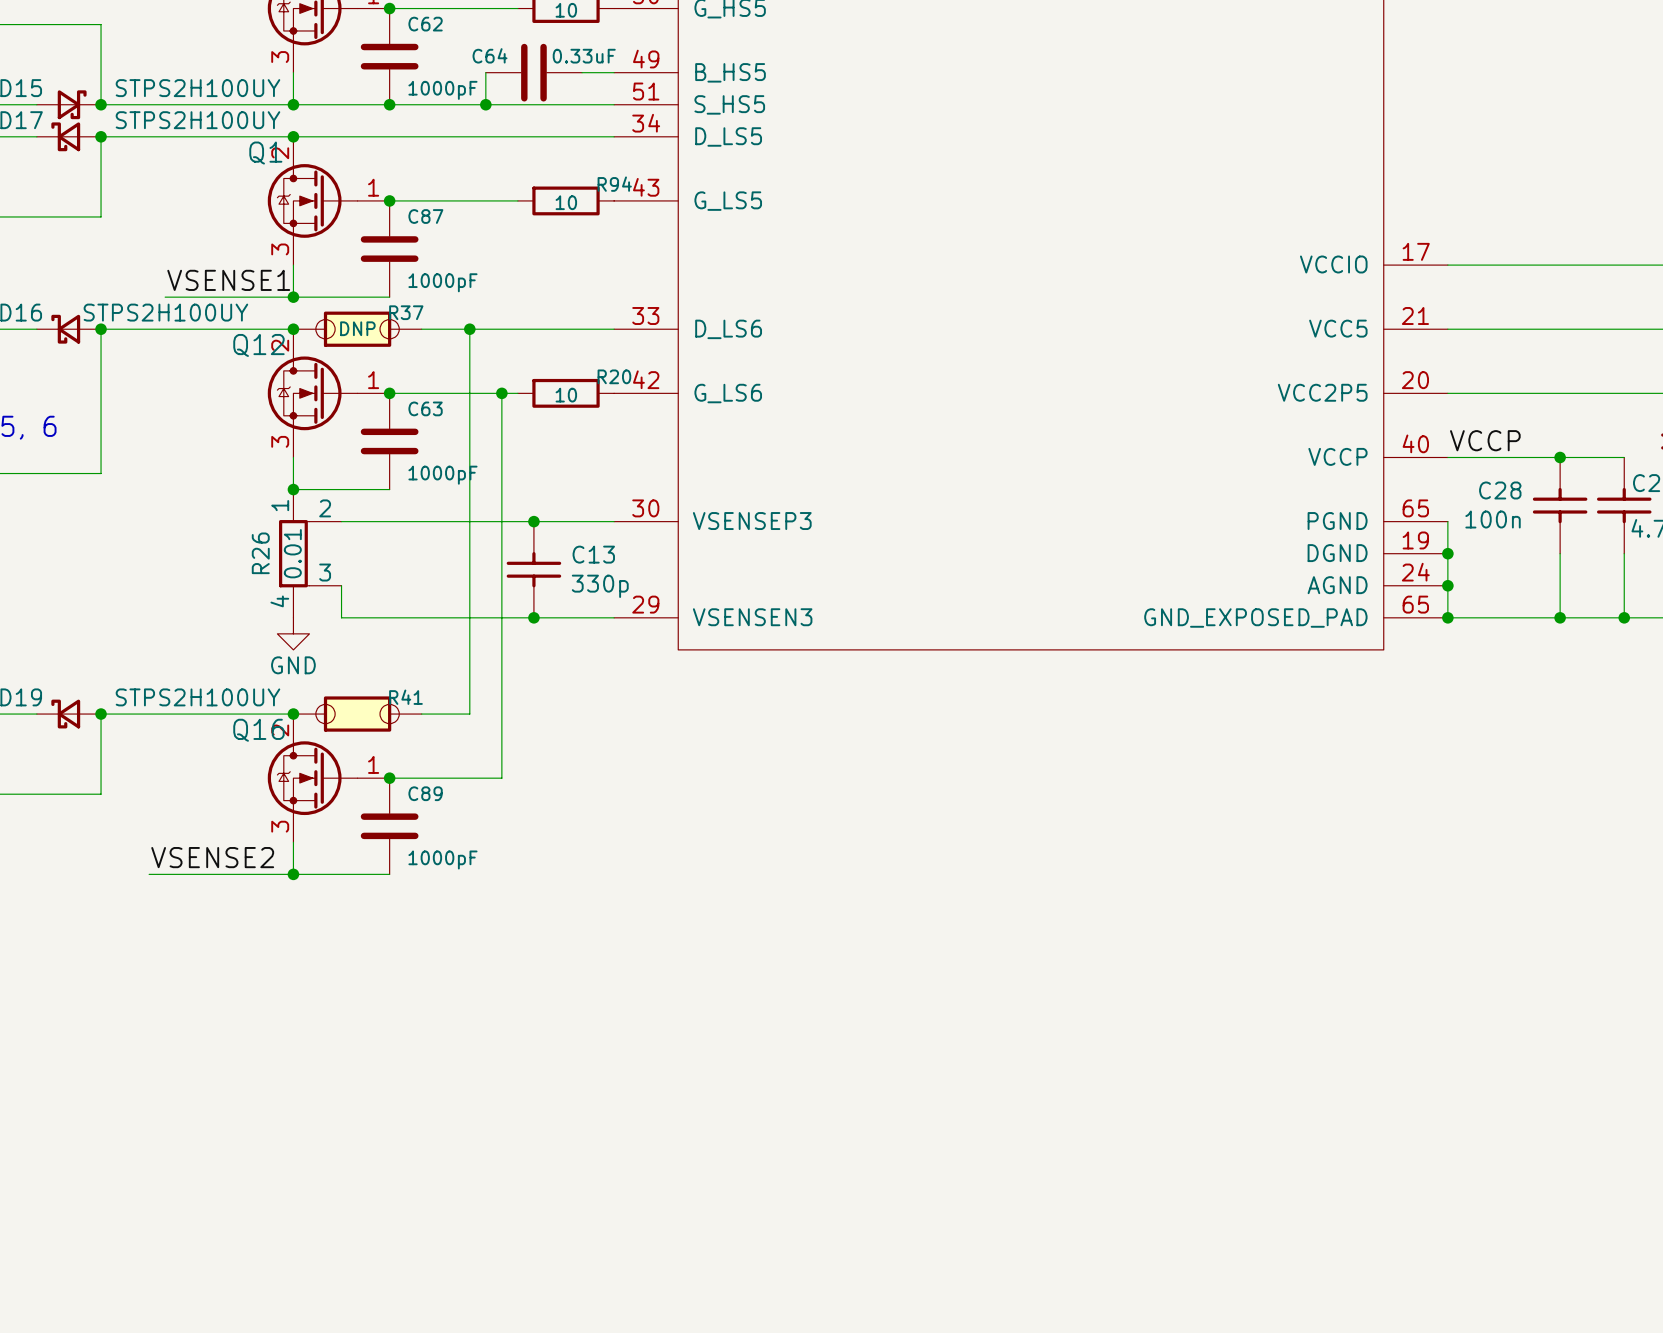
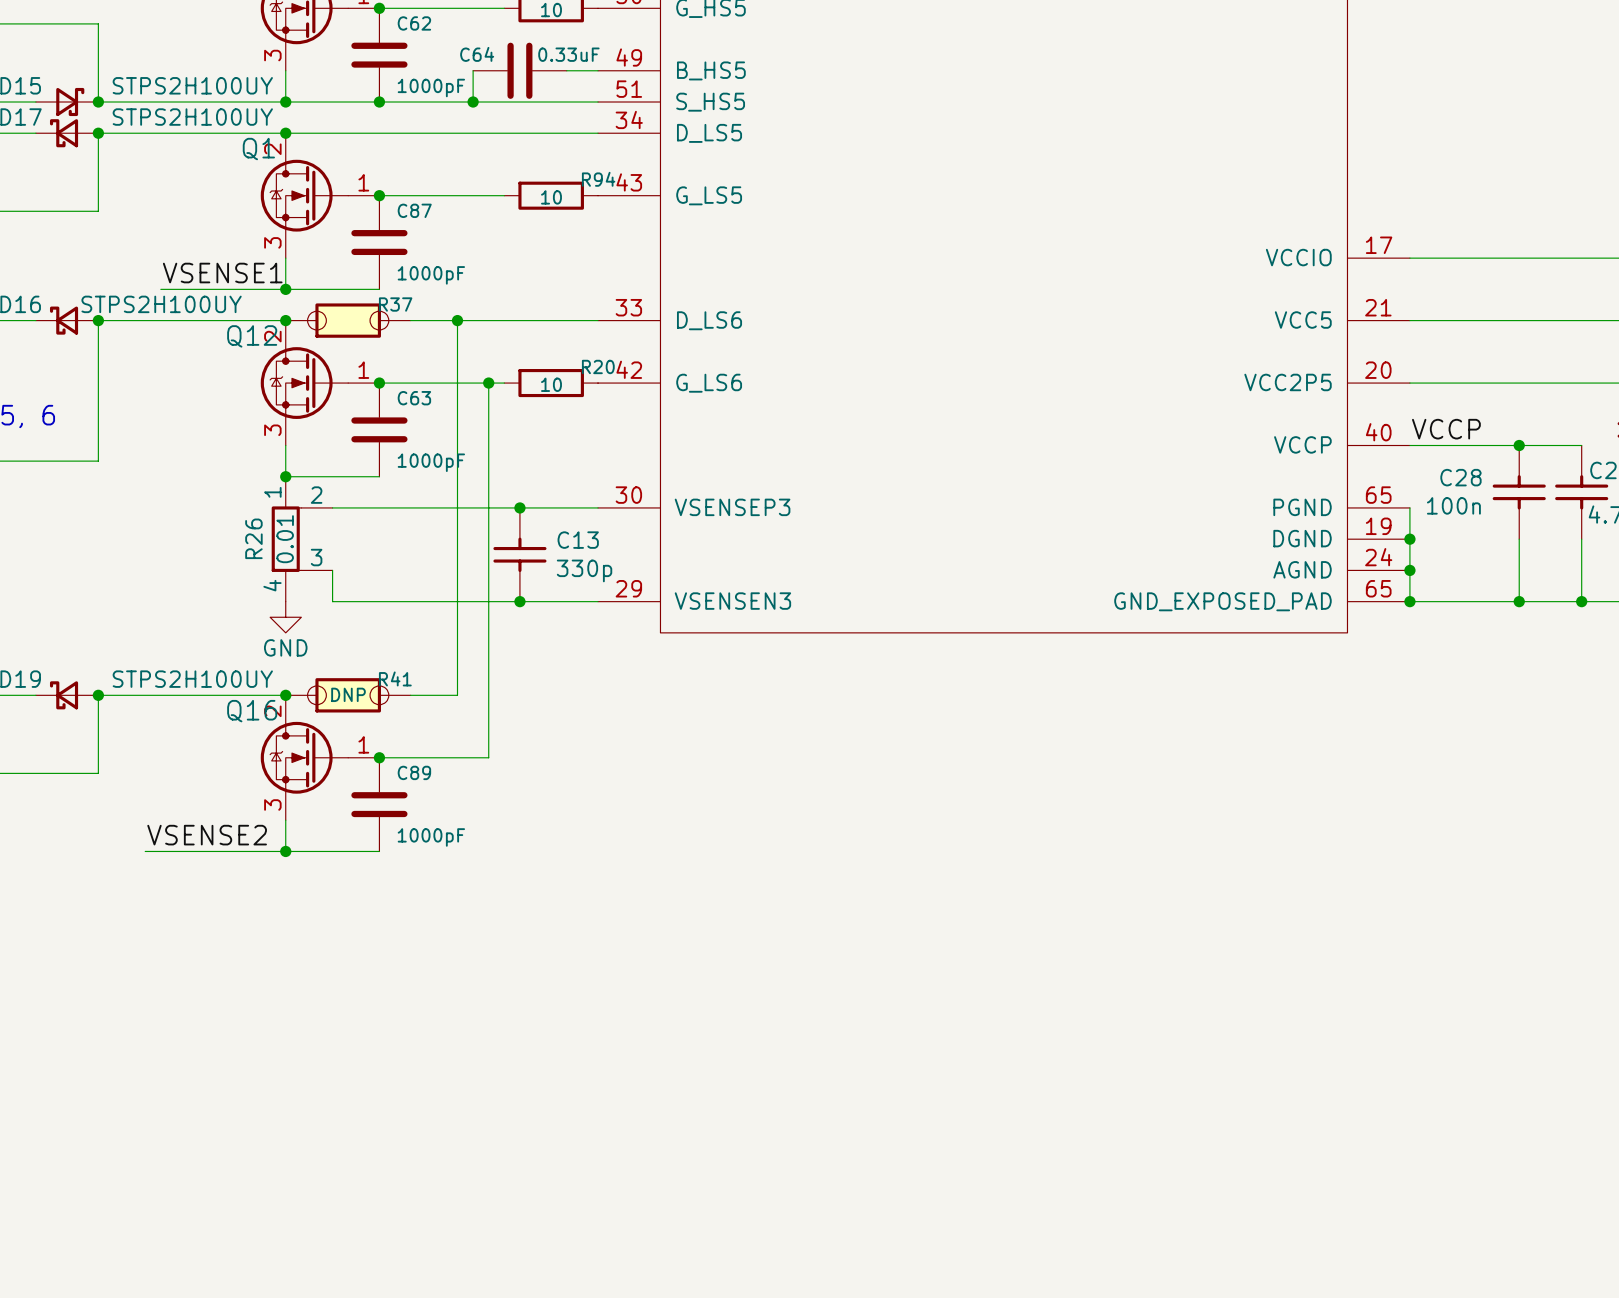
R37 value: DNP (357, 328) -> none
R41 value: none -> DNP (348, 694)

